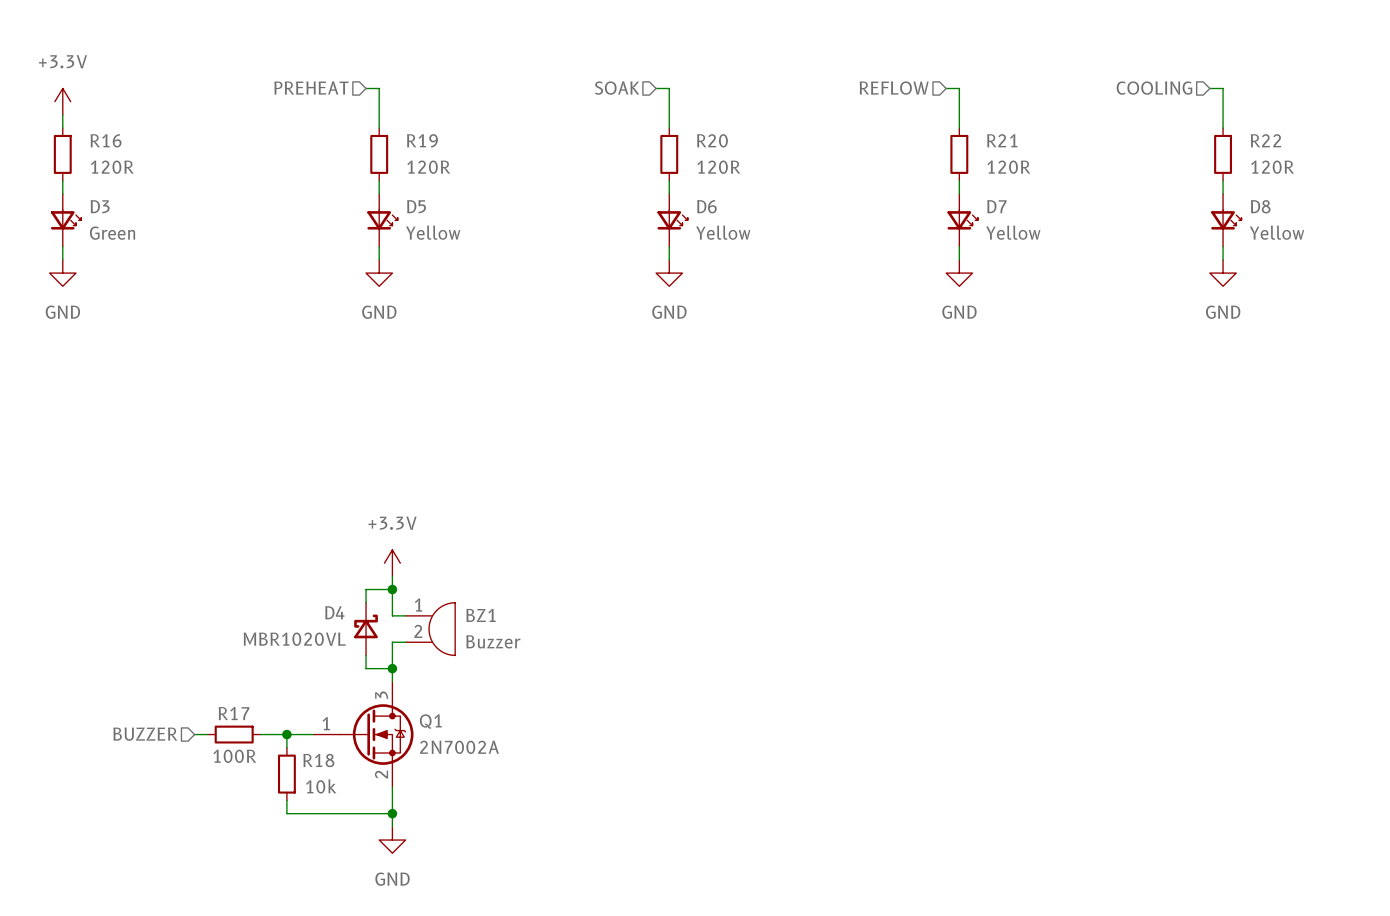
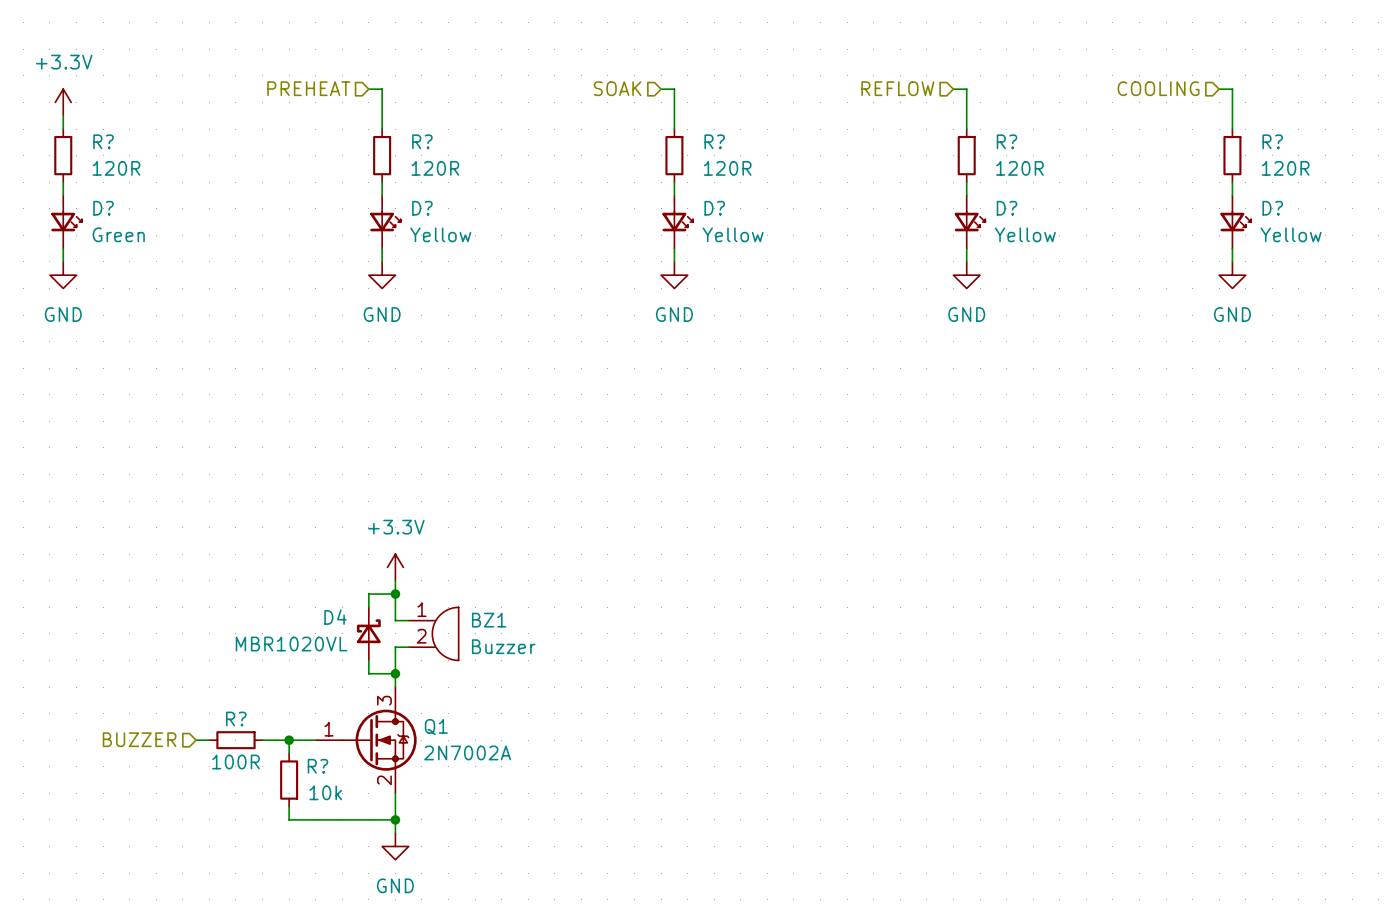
R16 name: R16 (105, 140) -> R? (103, 141)
R19 name: R19 (422, 140) -> R? (422, 141)
R20 name: R20 (712, 140) -> R? (714, 141)
R21 name: R21 (1002, 140) -> R? (1006, 141)
R22 name: R22 (1265, 140) -> R? (1272, 141)
D3 name: D3 (100, 206) -> D? (103, 208)
D5 name: D5 (416, 206) -> D? (422, 208)
D6 name: D6 (706, 206) -> D? (714, 208)
D7 name: D7 (996, 206) -> D? (1006, 208)
D8 name: D8 (1260, 206) -> D? (1272, 208)
R17 name: R17 (233, 713) -> R? (236, 719)
R18 name: R18 (318, 760) -> R? (317, 766)

